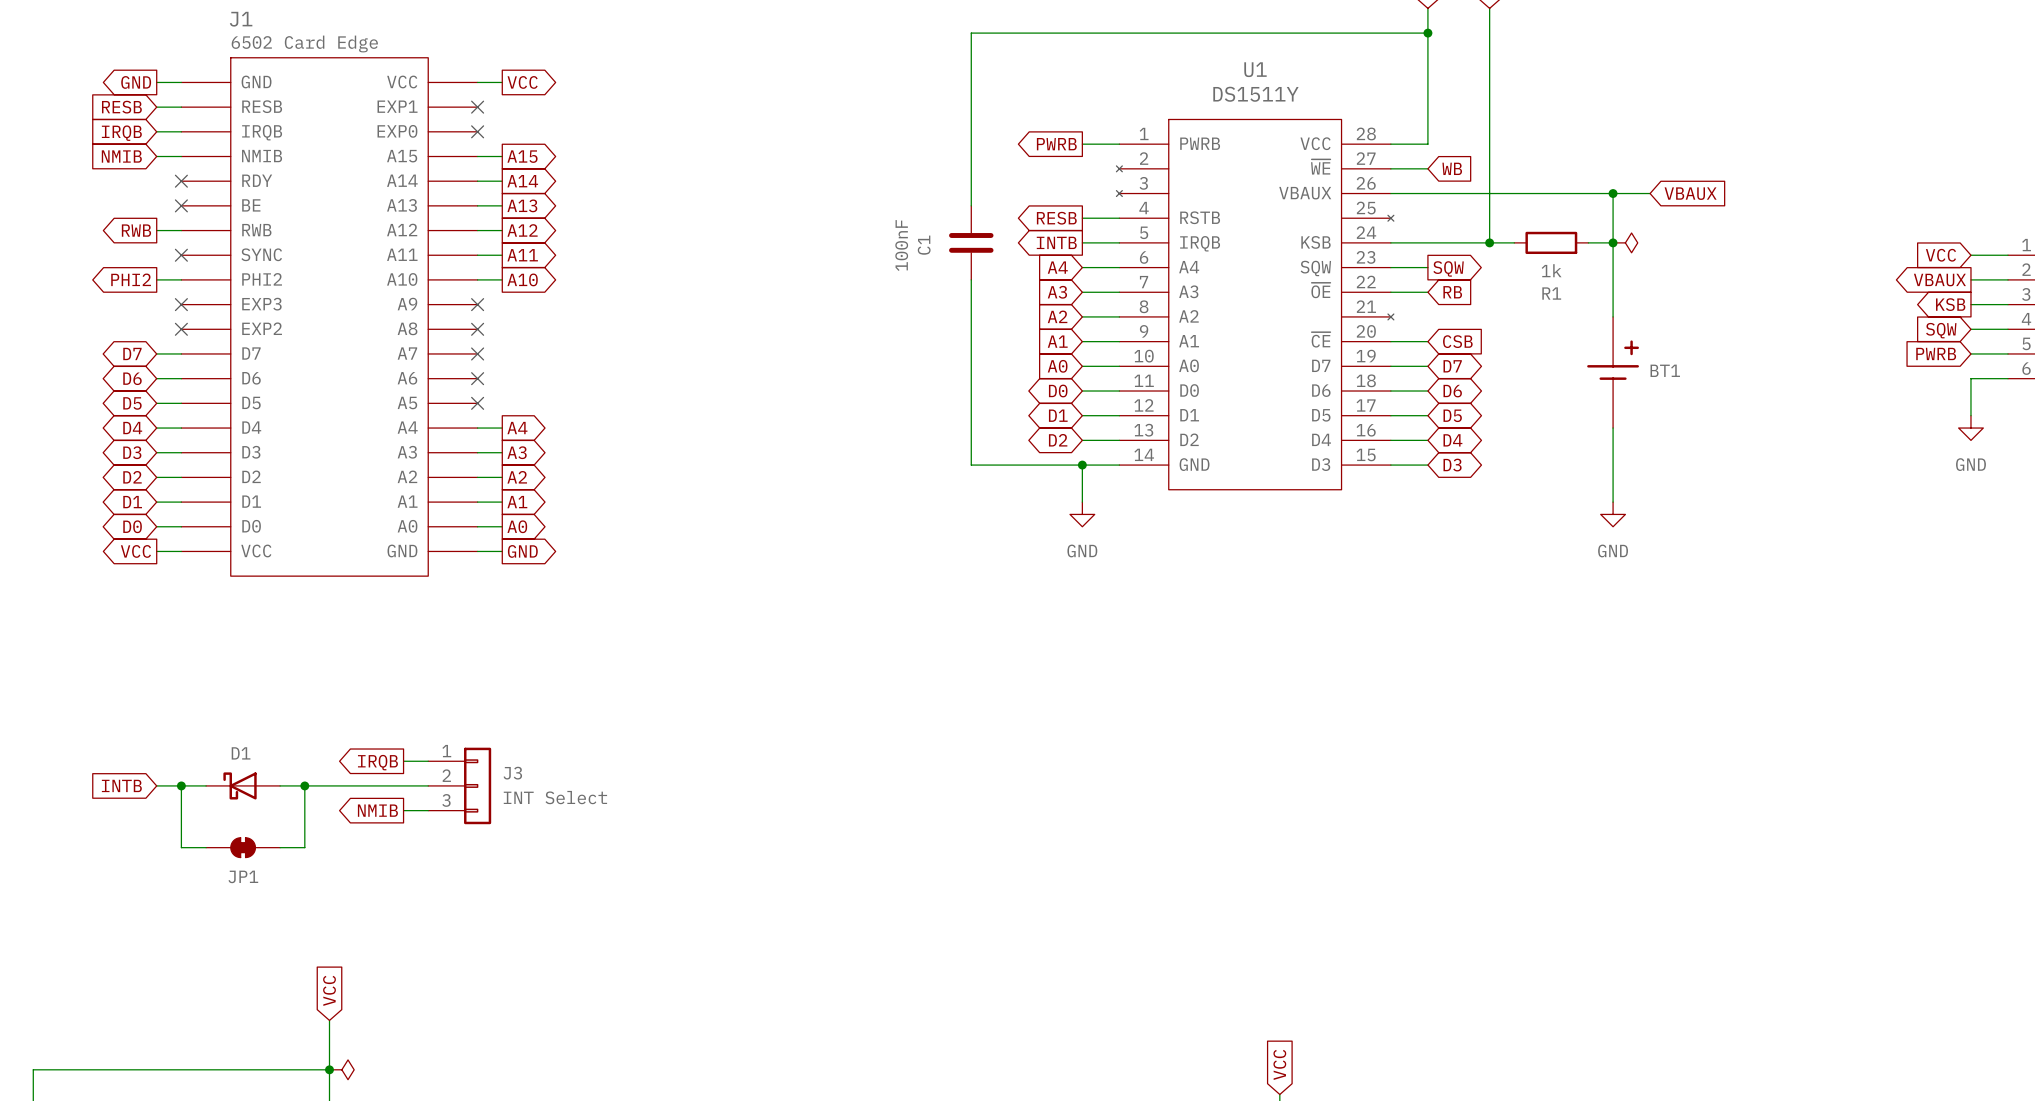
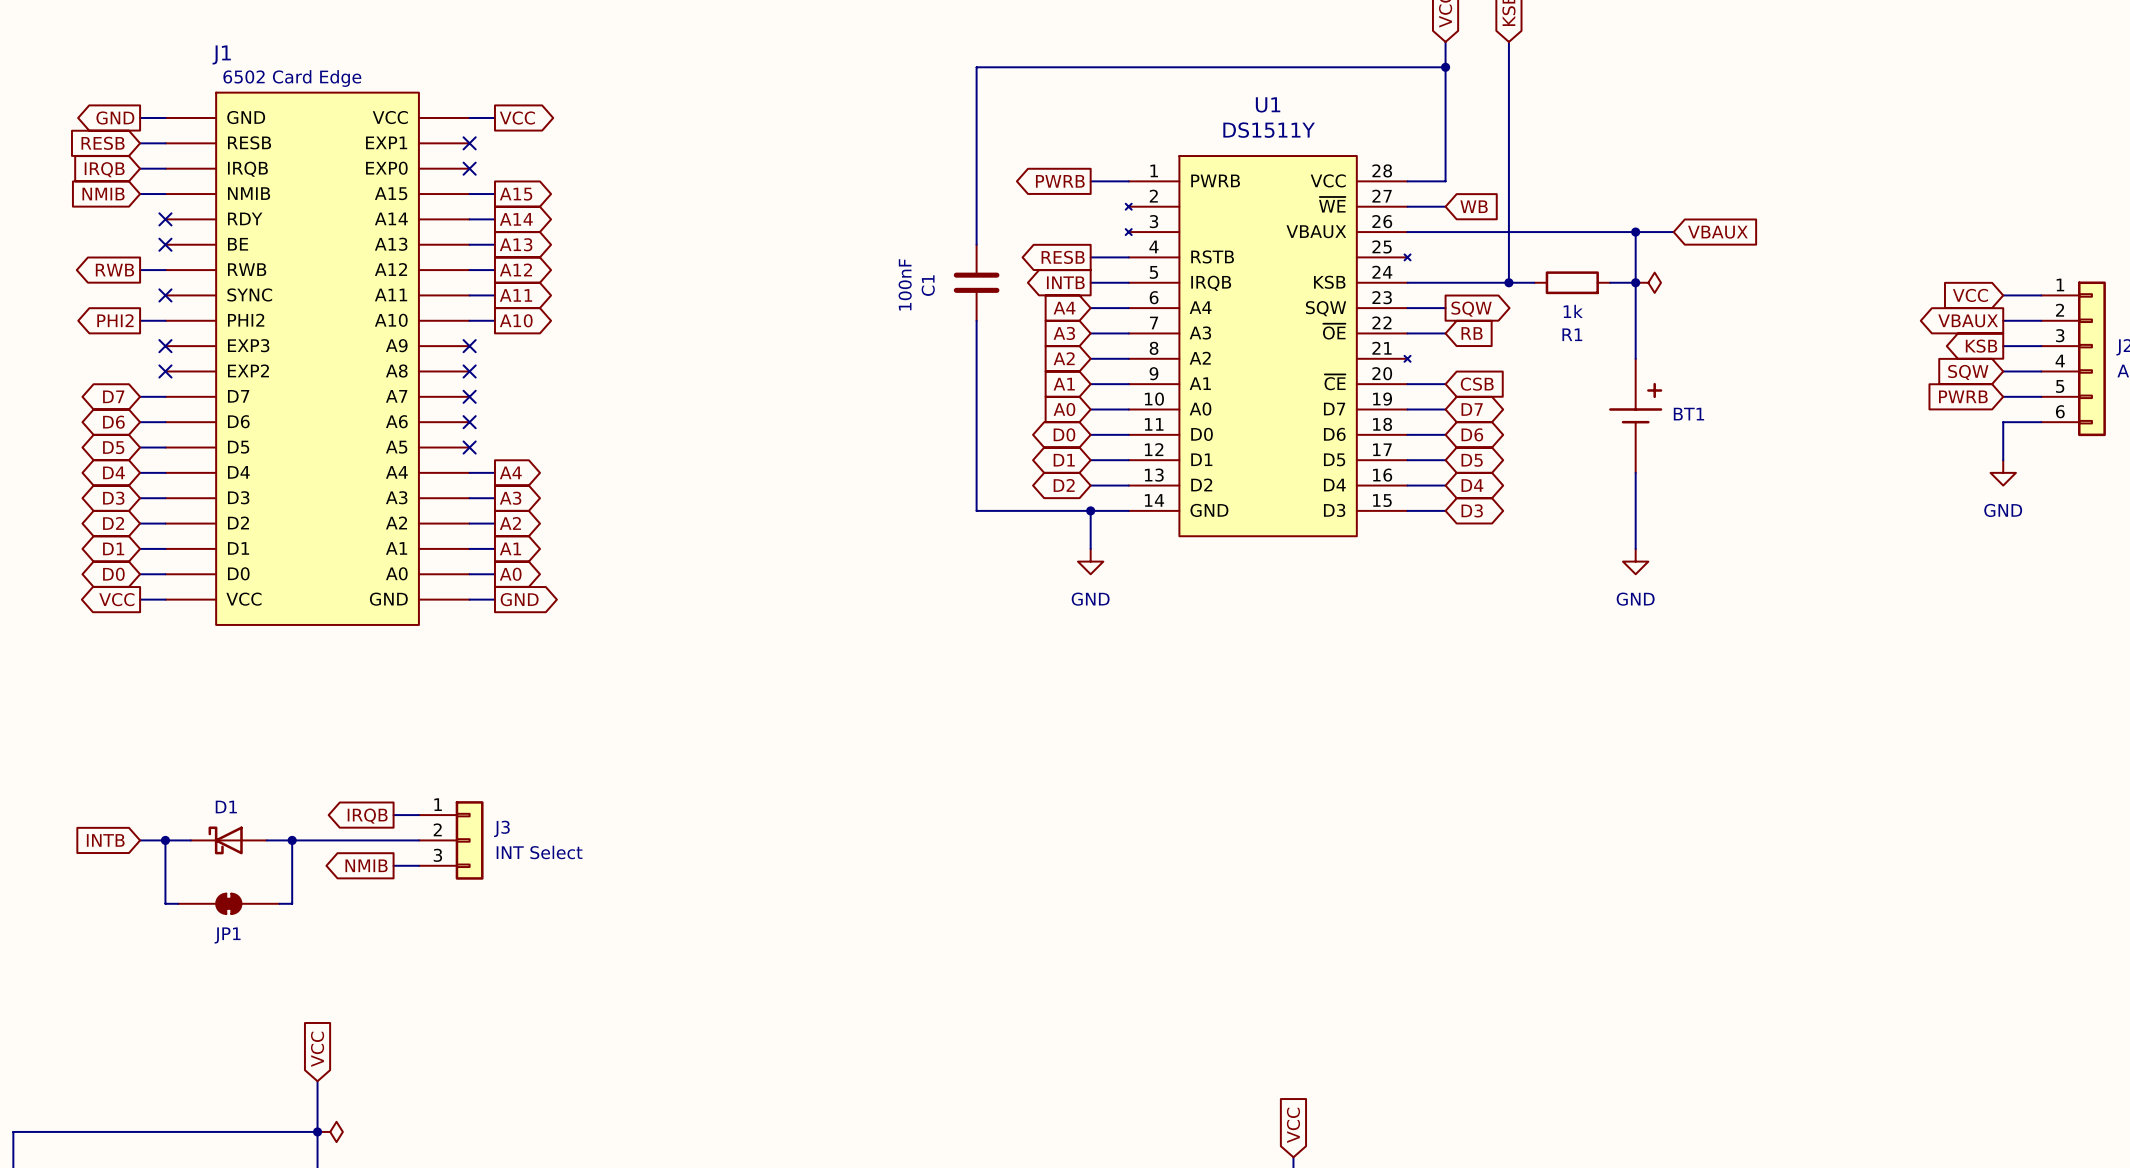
JP1 symbol: [206, 837, 281, 858] -> [178, 892, 280, 915]

